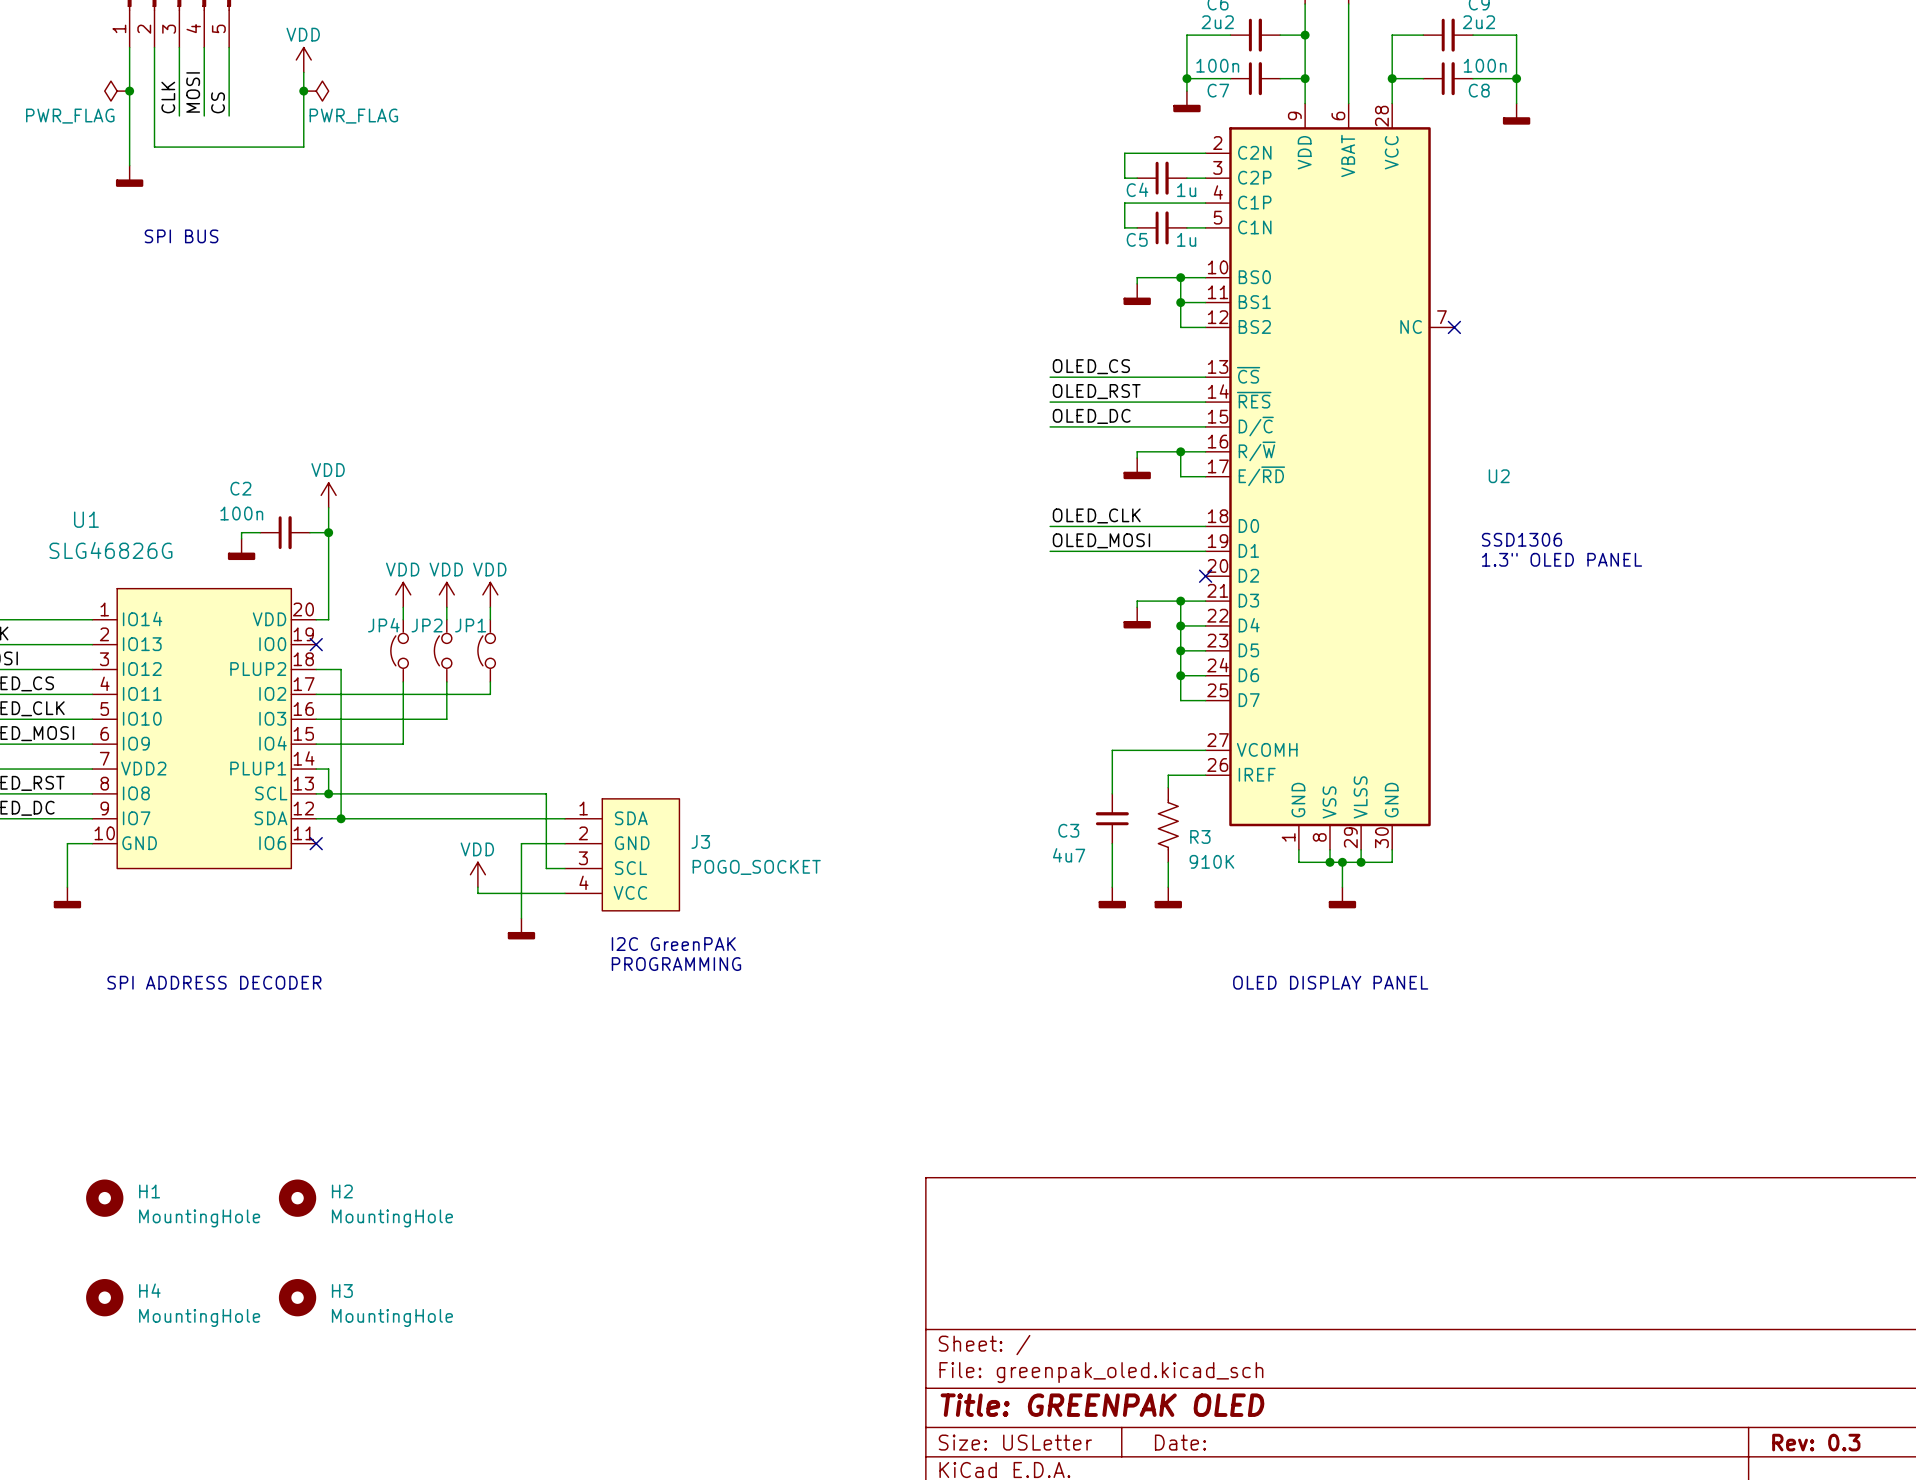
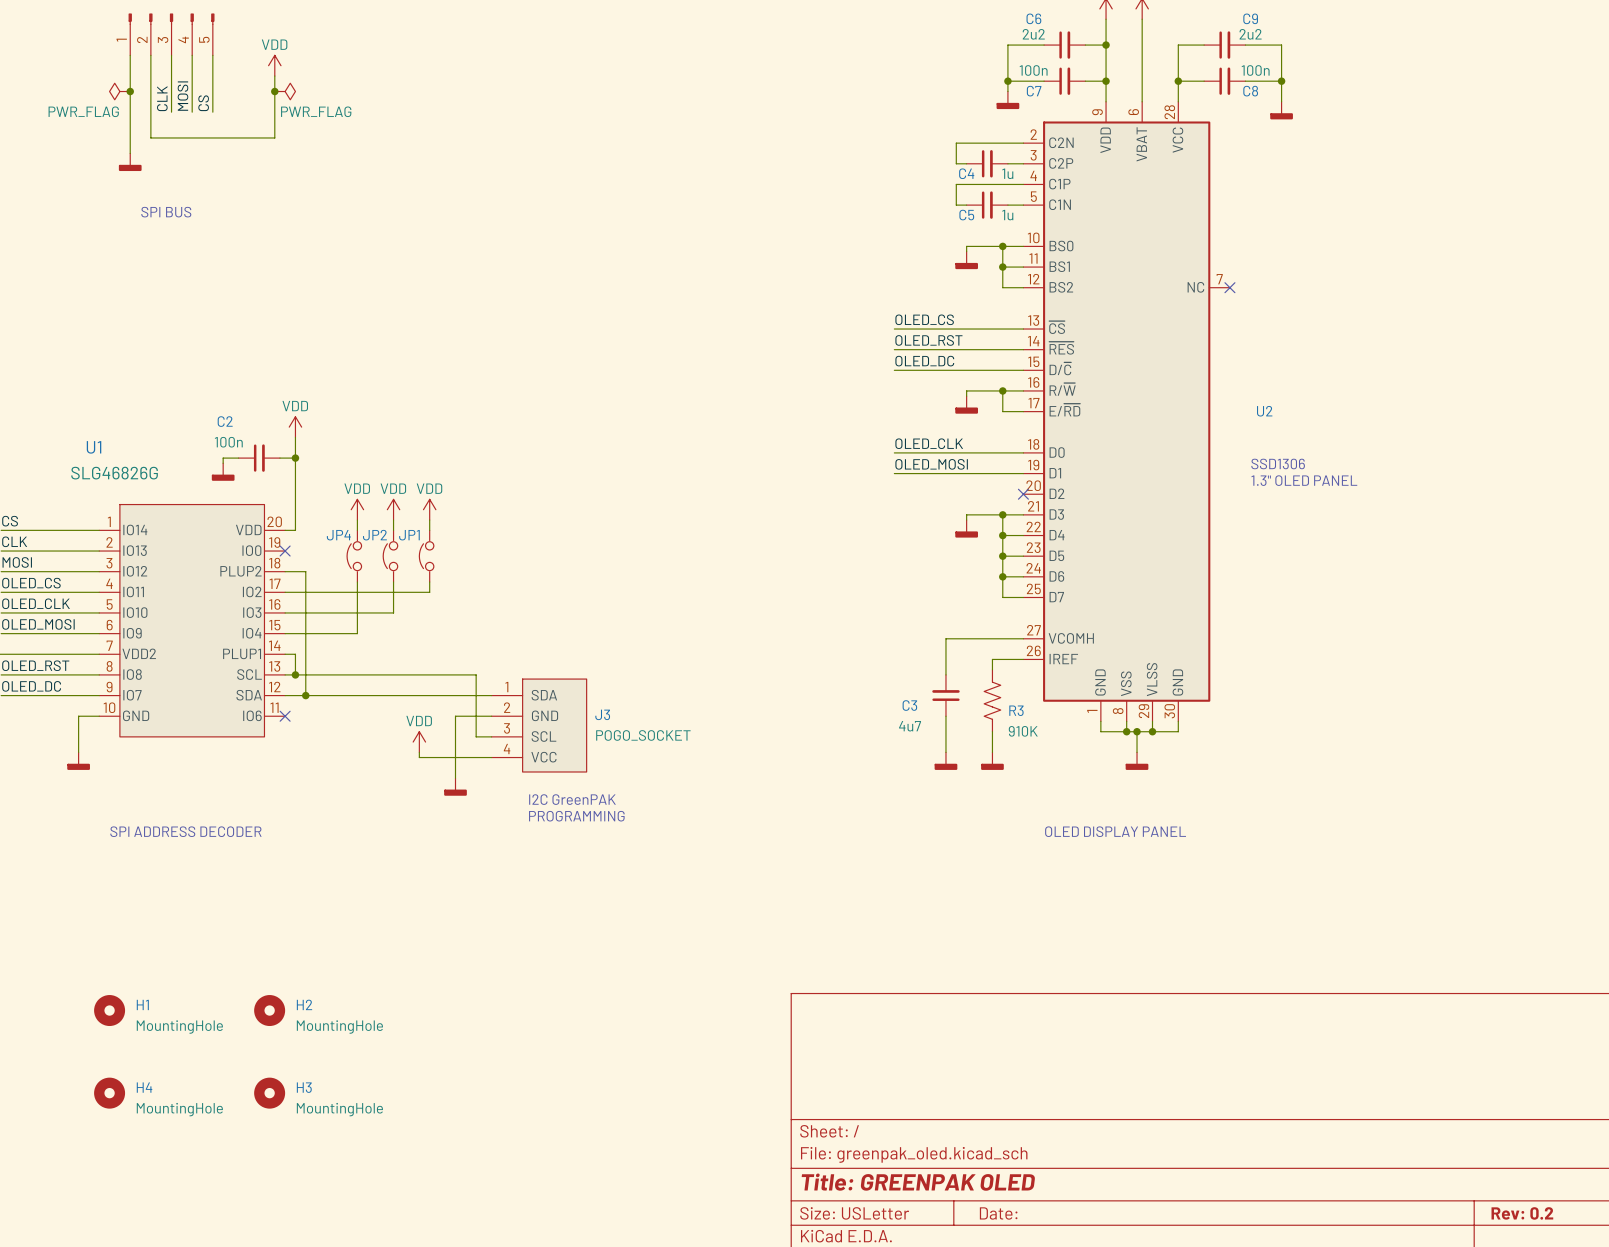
title block: Rev: 0.3 (1816, 1442) -> Rev: 0.2 (1522, 1213)

